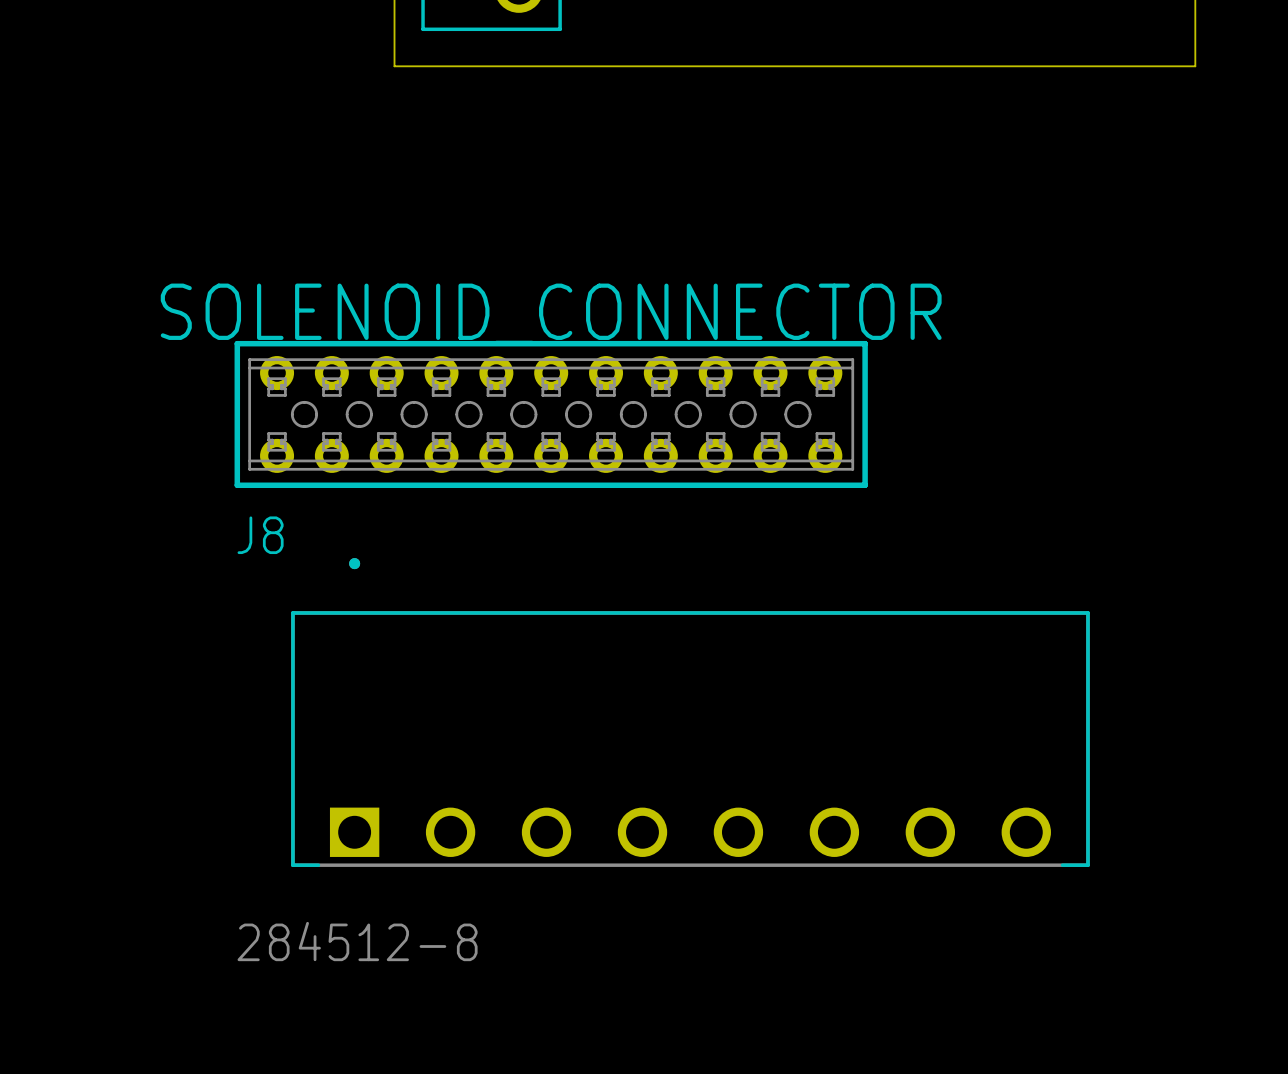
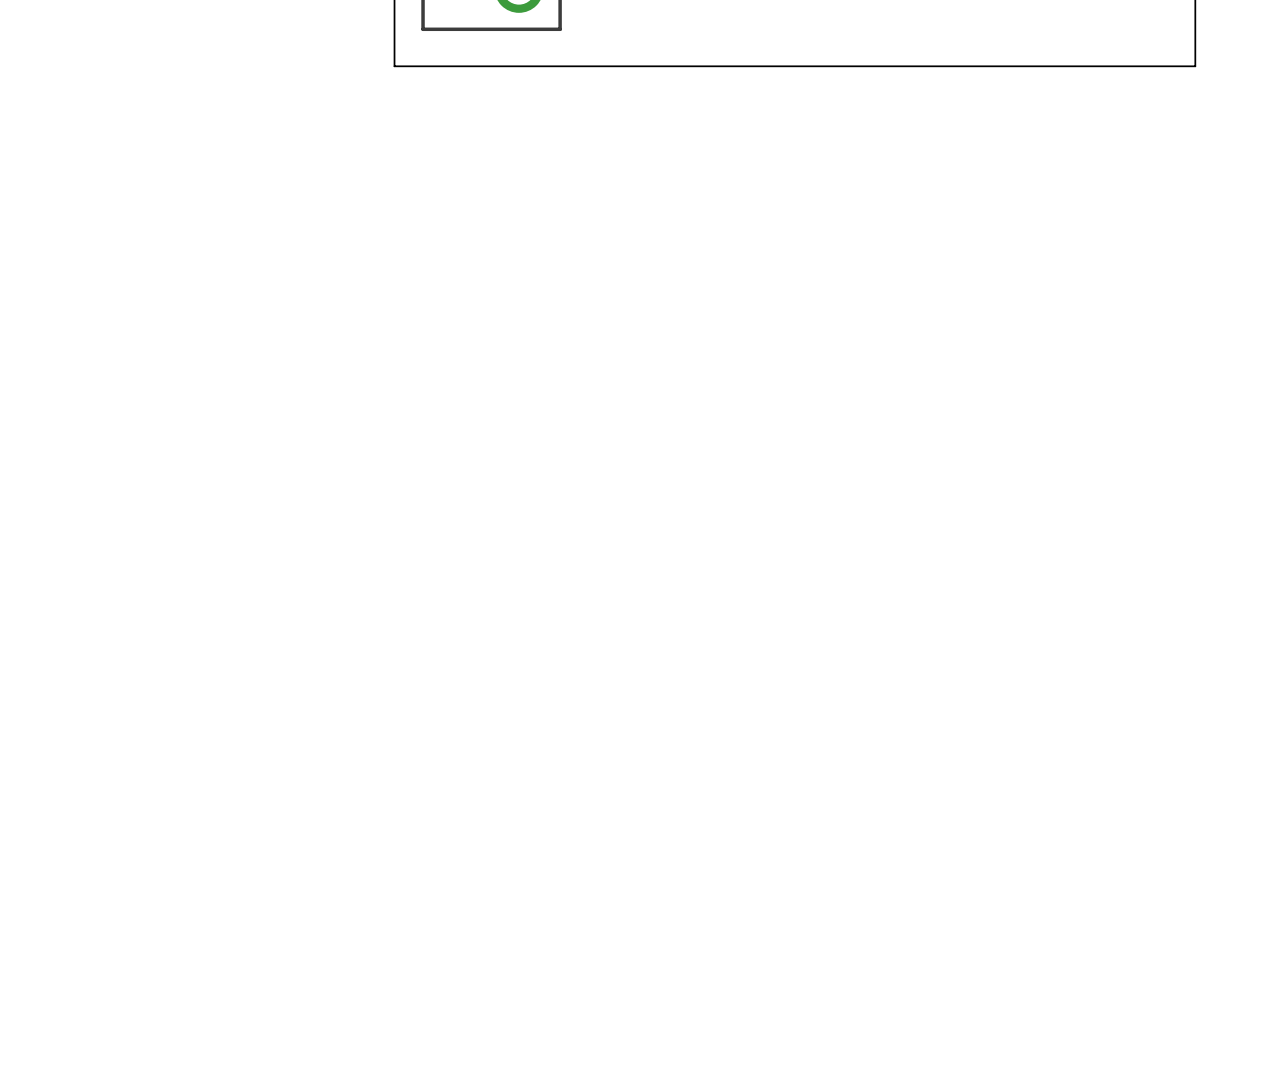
SOLENOID_CONNECTOR: (551, 414) -> none
J8: 284512-8 (690, 712) -> none

